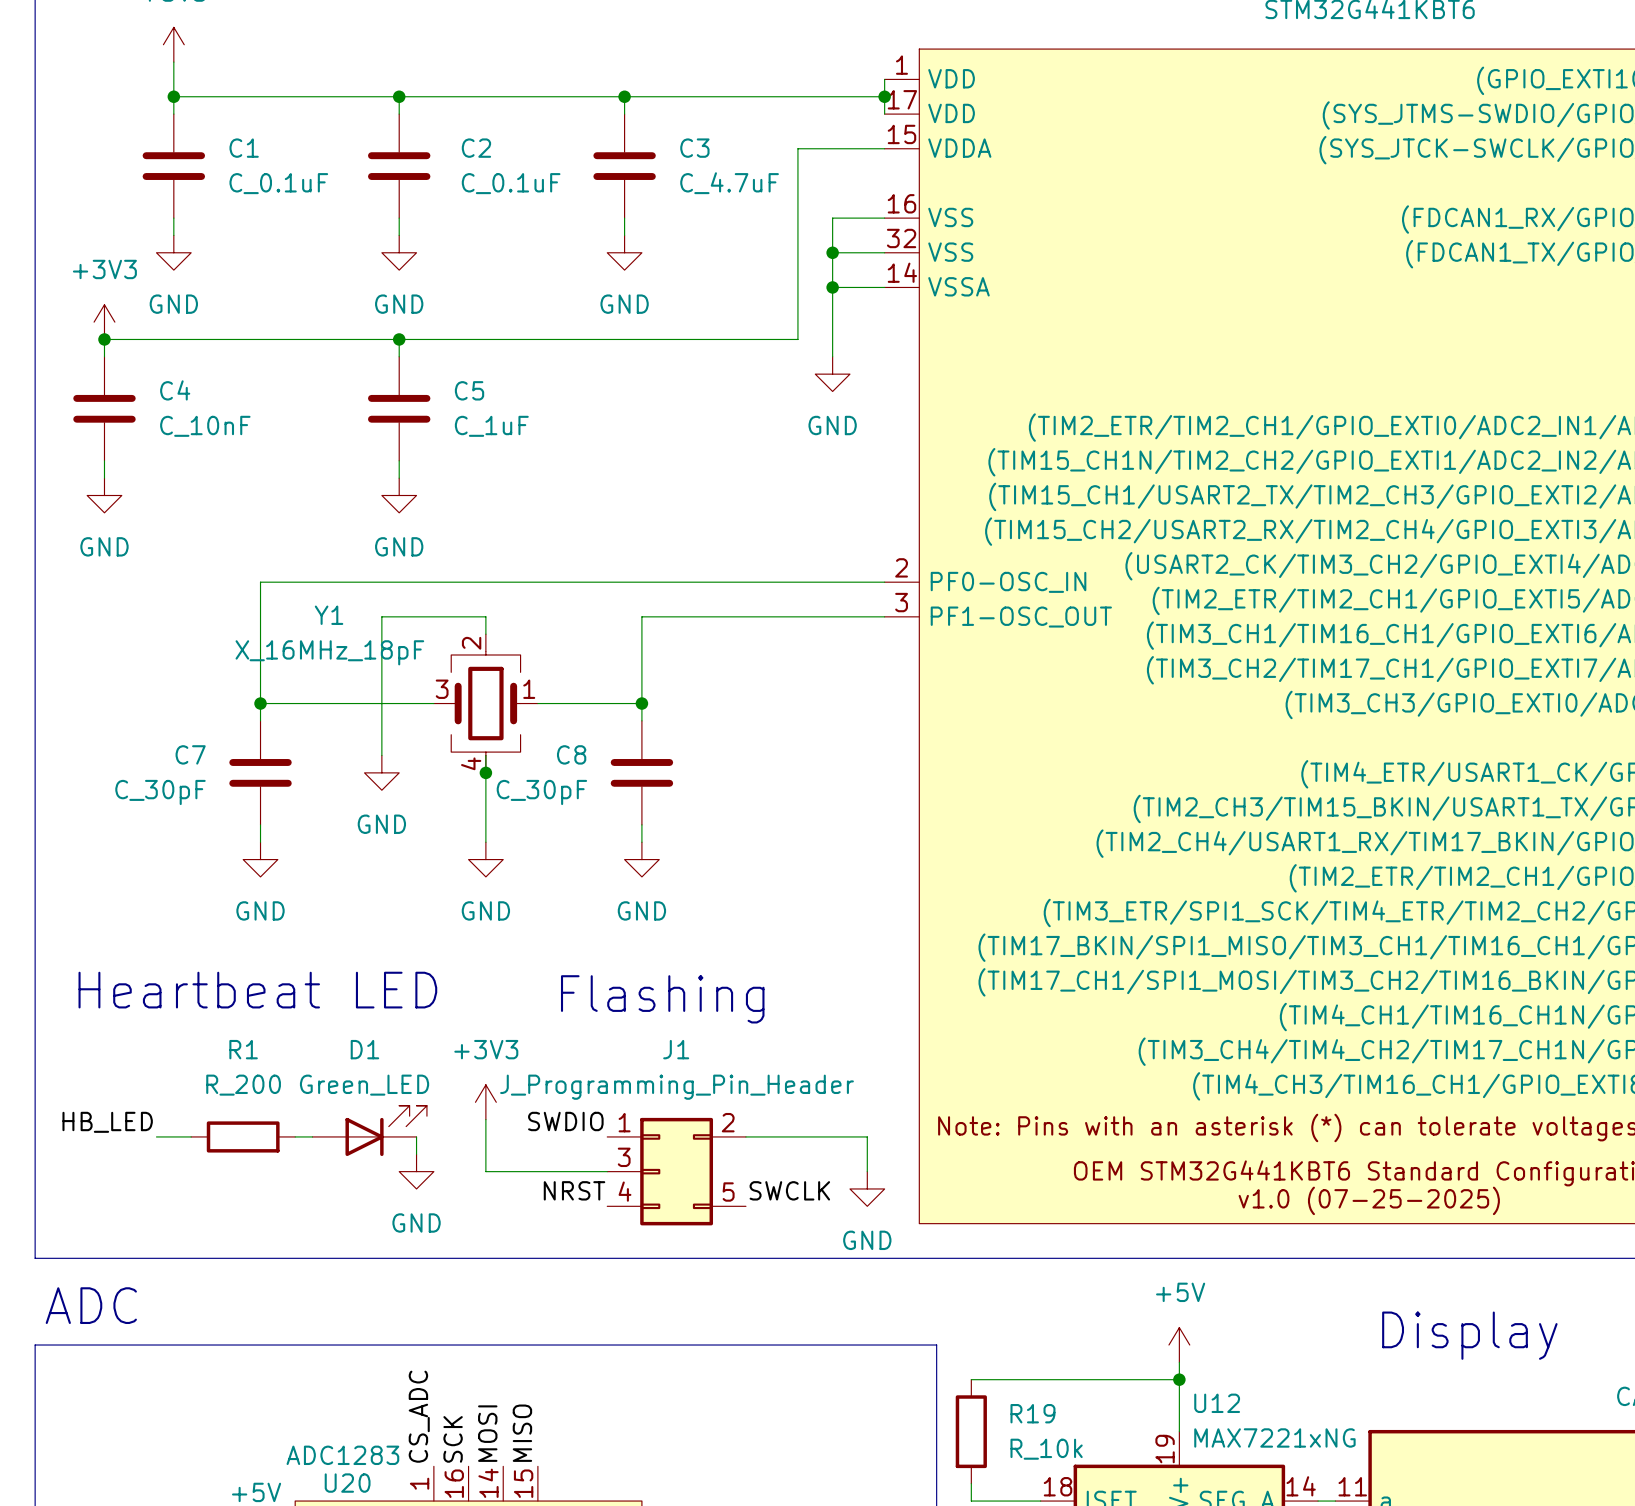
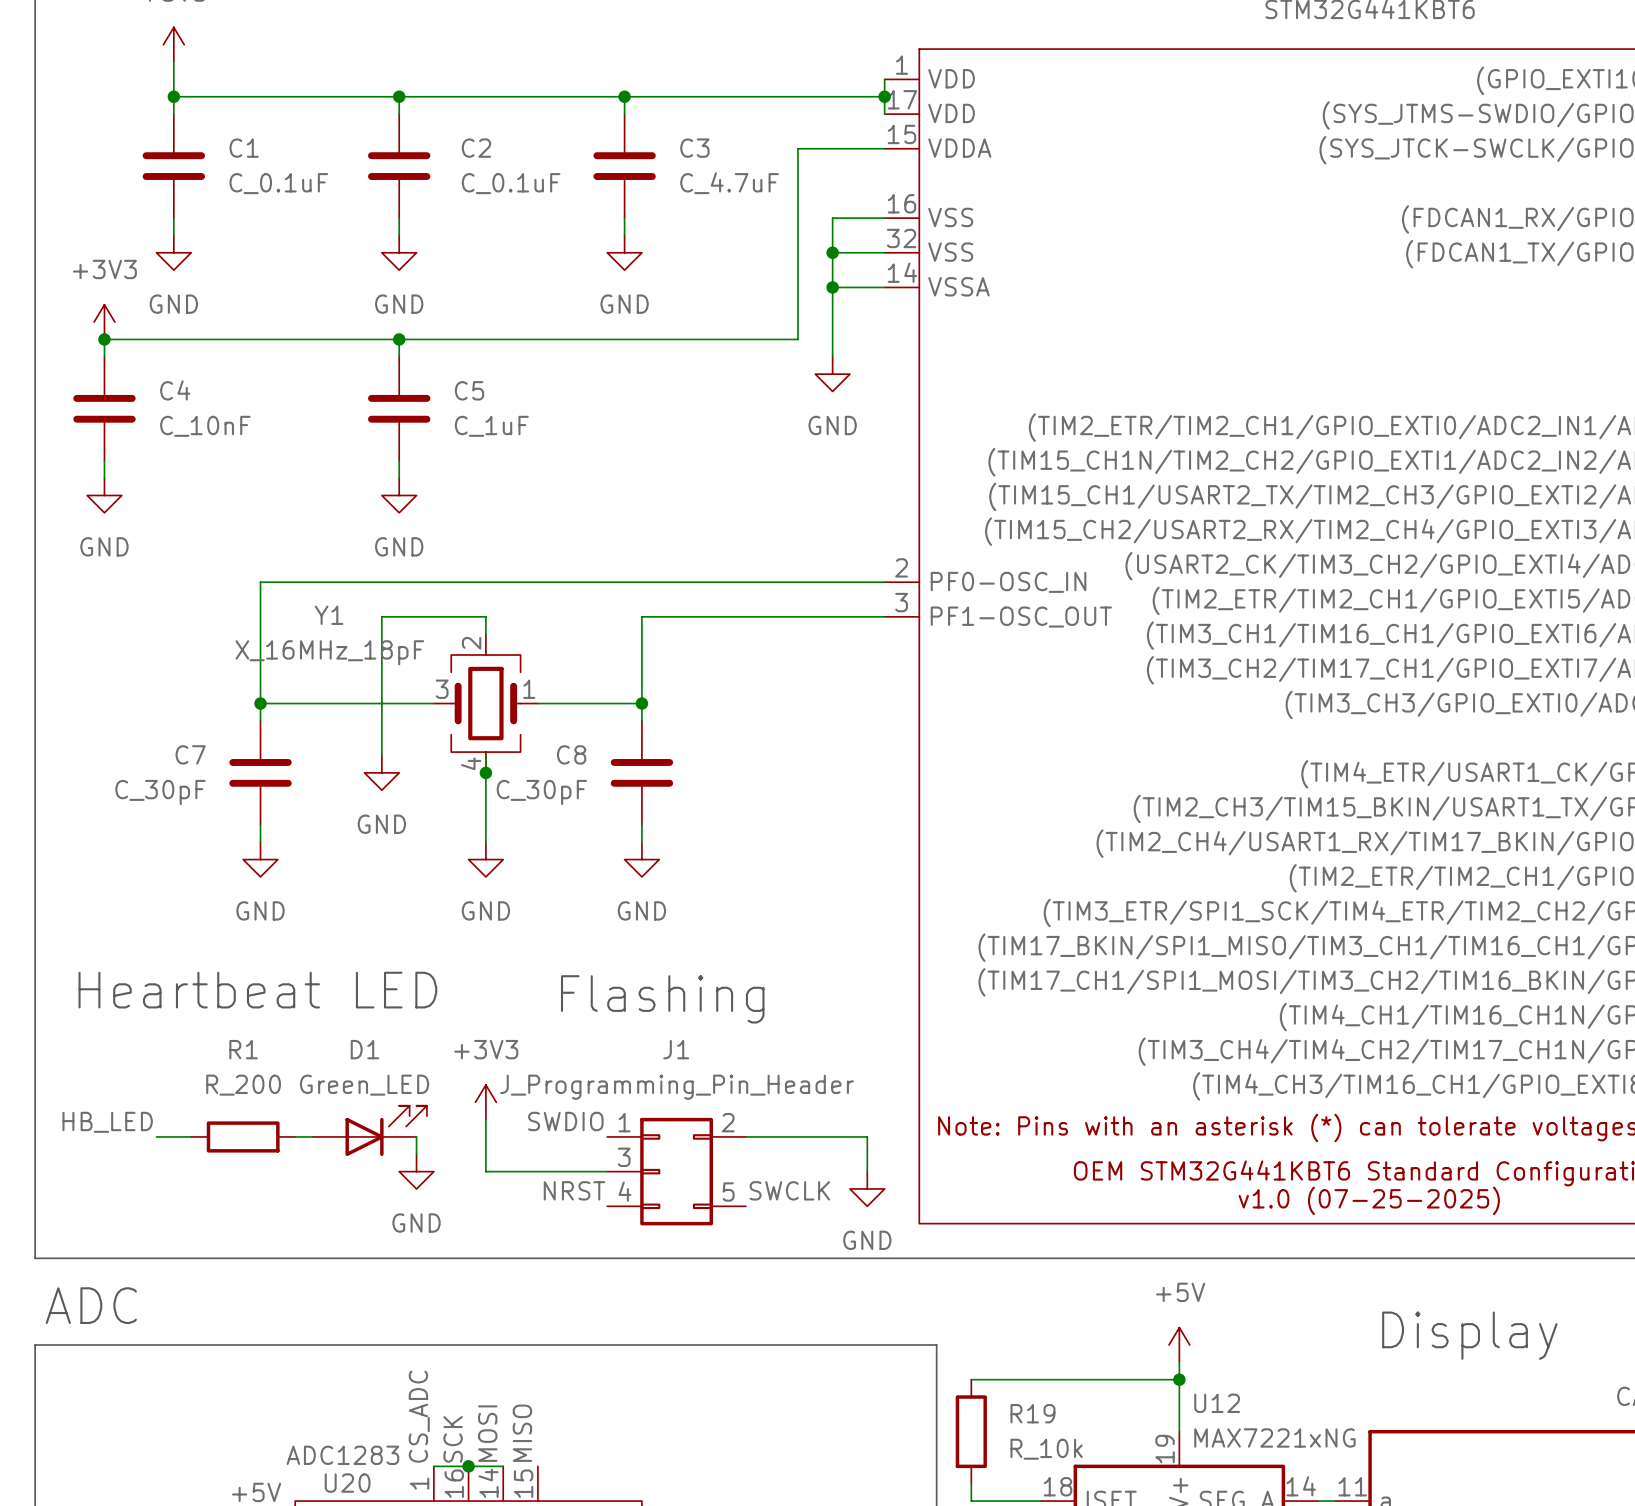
wire: none -> (433, 1466) (503, 1466)
junction: none -> (468, 1466)

